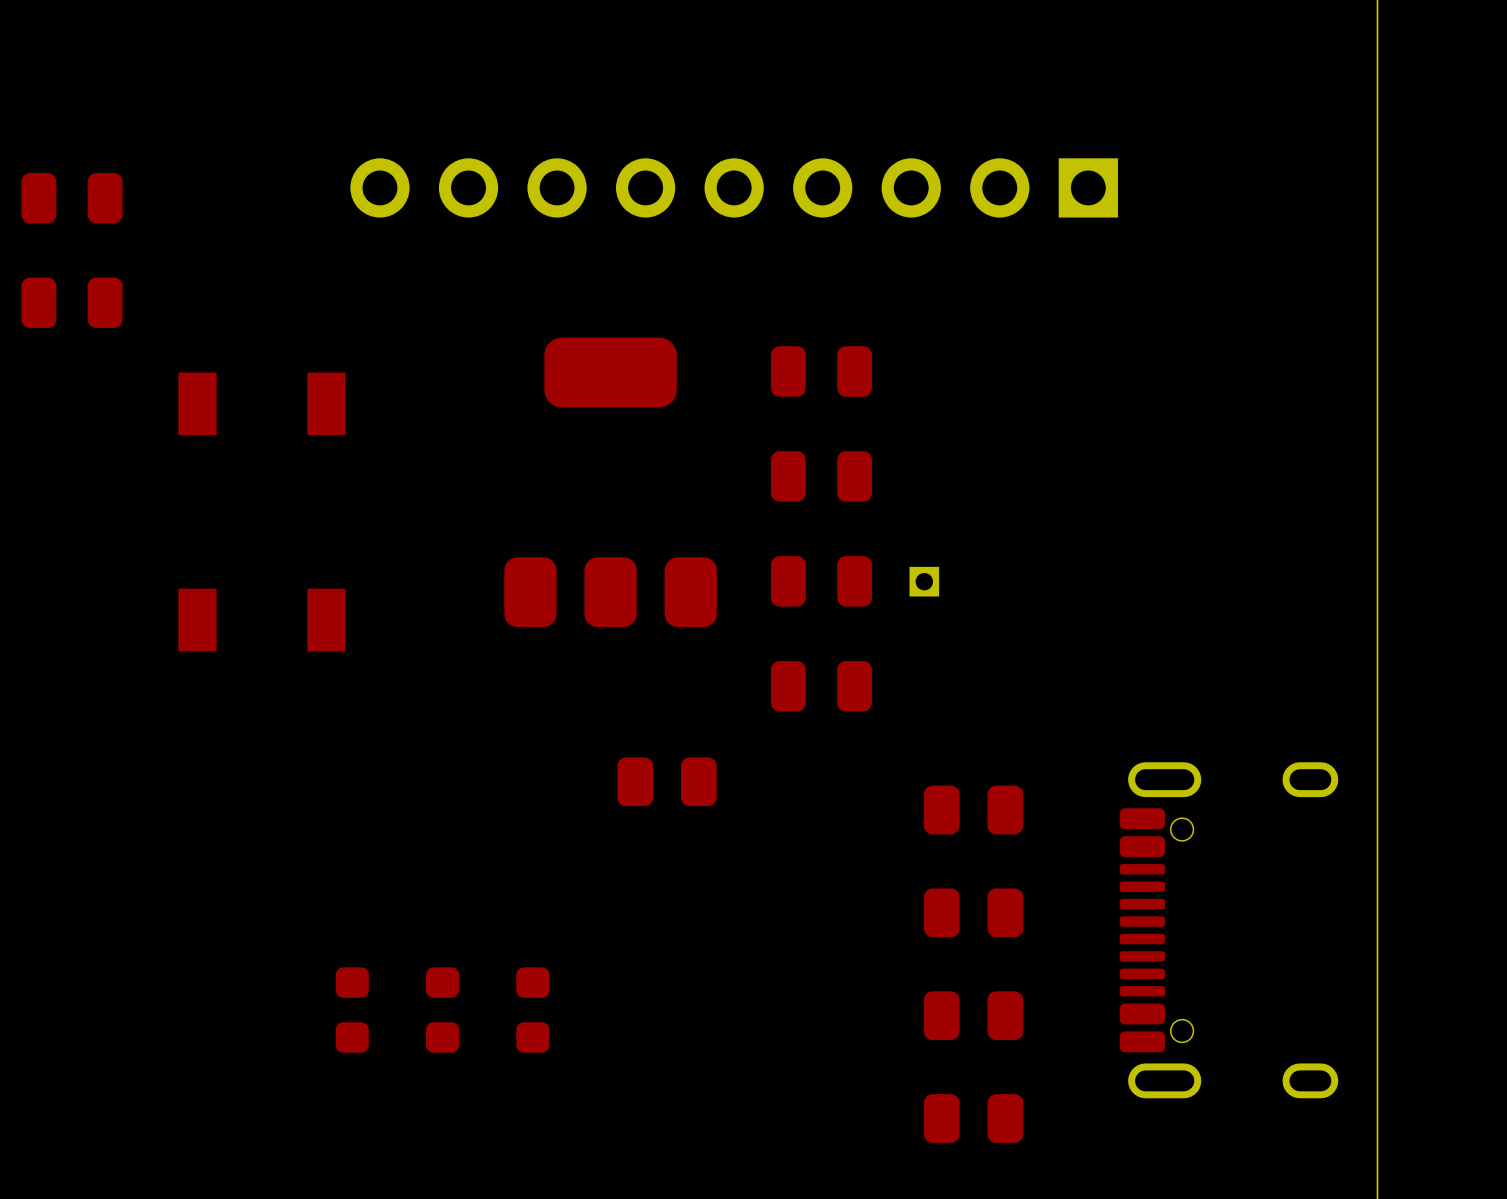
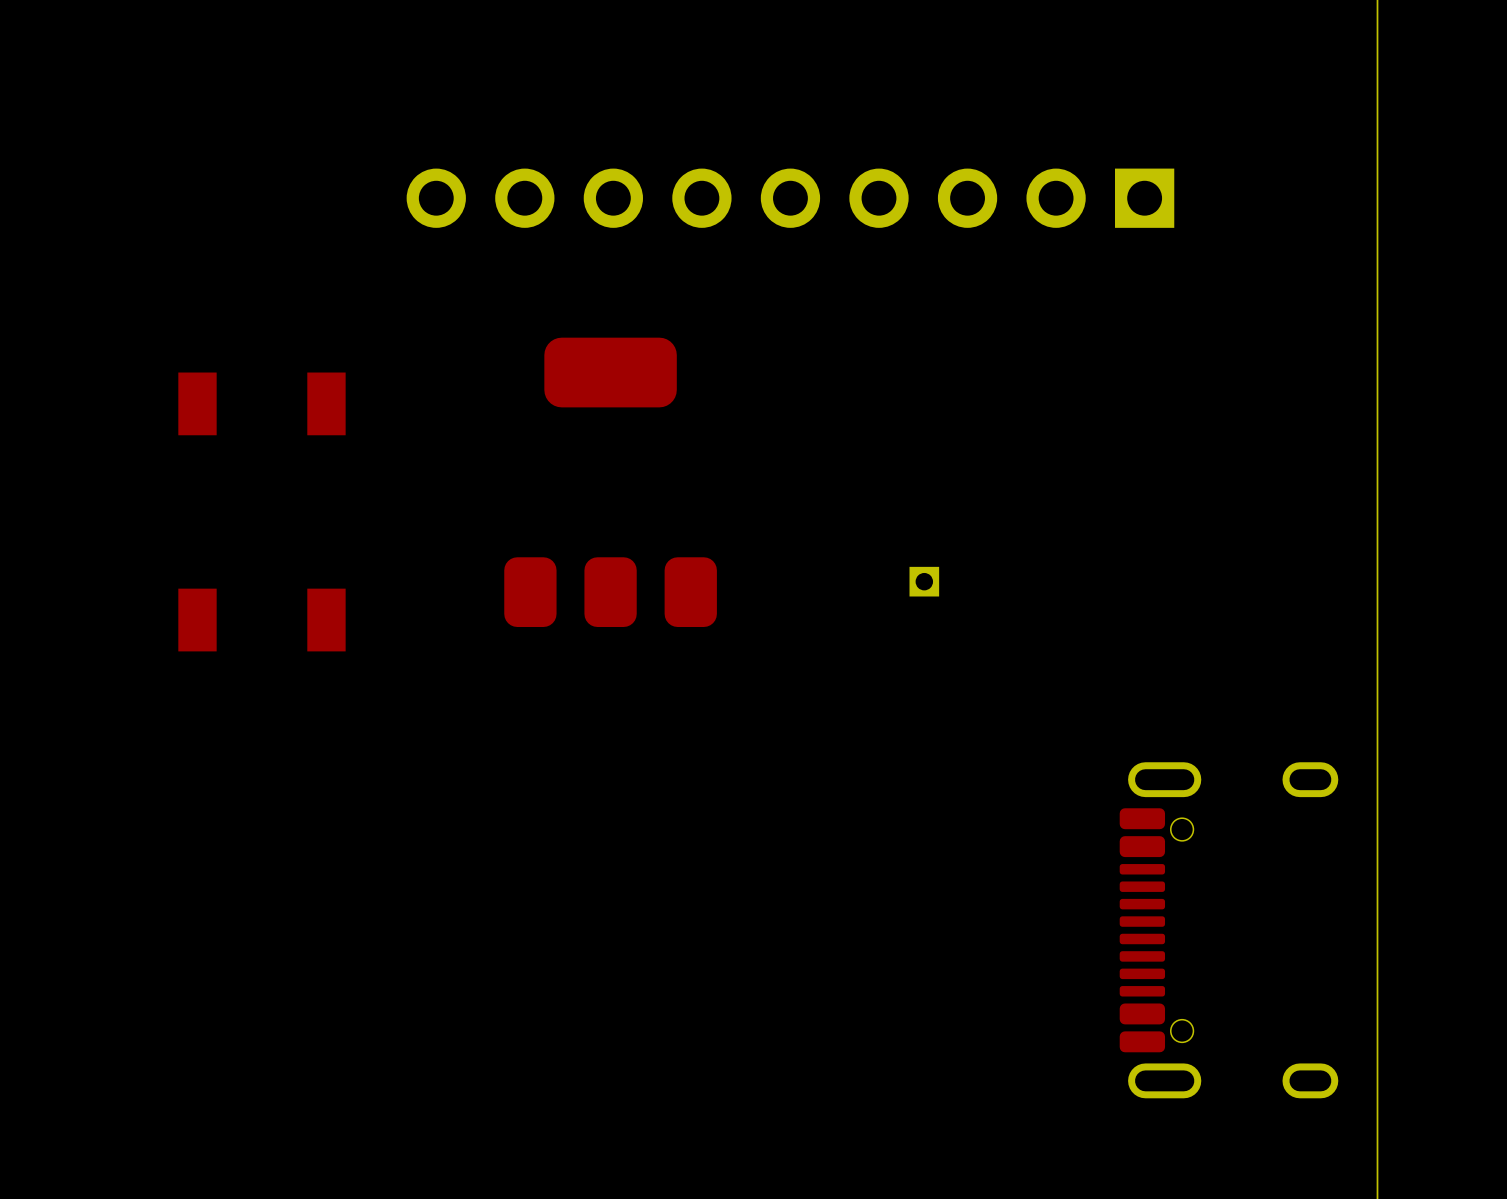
part position: (734, 187) -> (790, 198)
part: (71, 198) -> none
part: (71, 302) -> none
part: (821, 371) -> none
part: (821, 476) -> none
part: (821, 581) -> none
part: (821, 686) -> none
part: (667, 781) -> none
part: (973, 810) -> none
part: (973, 912) -> none
part: (352, 1010) -> none
part: (442, 1010) -> none
part: (532, 1010) -> none
part: (973, 1015) -> none
part: (973, 1118) -> none

